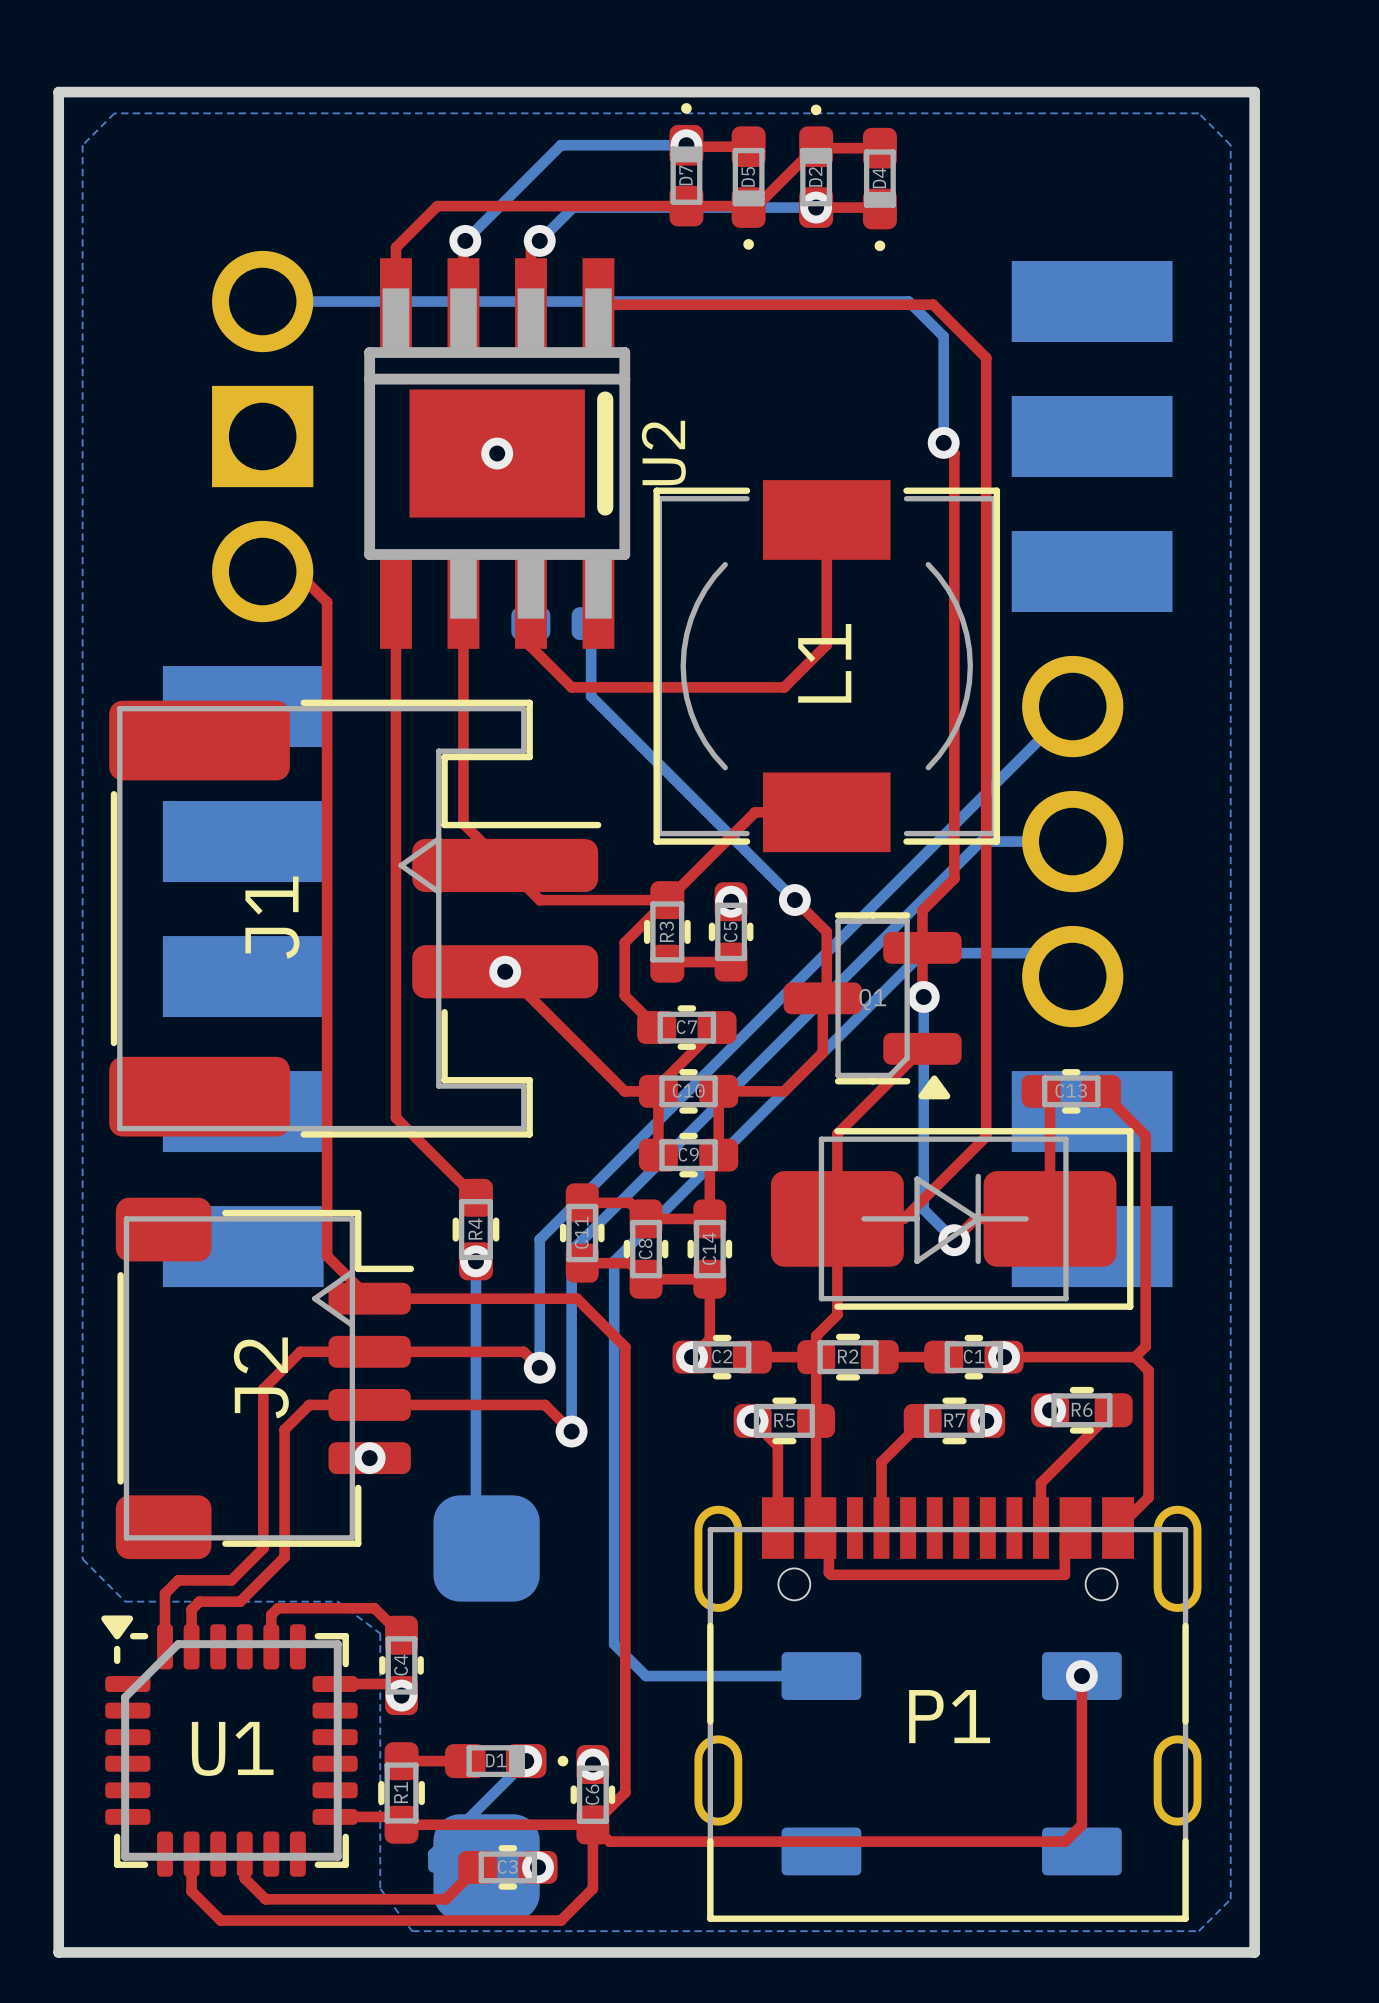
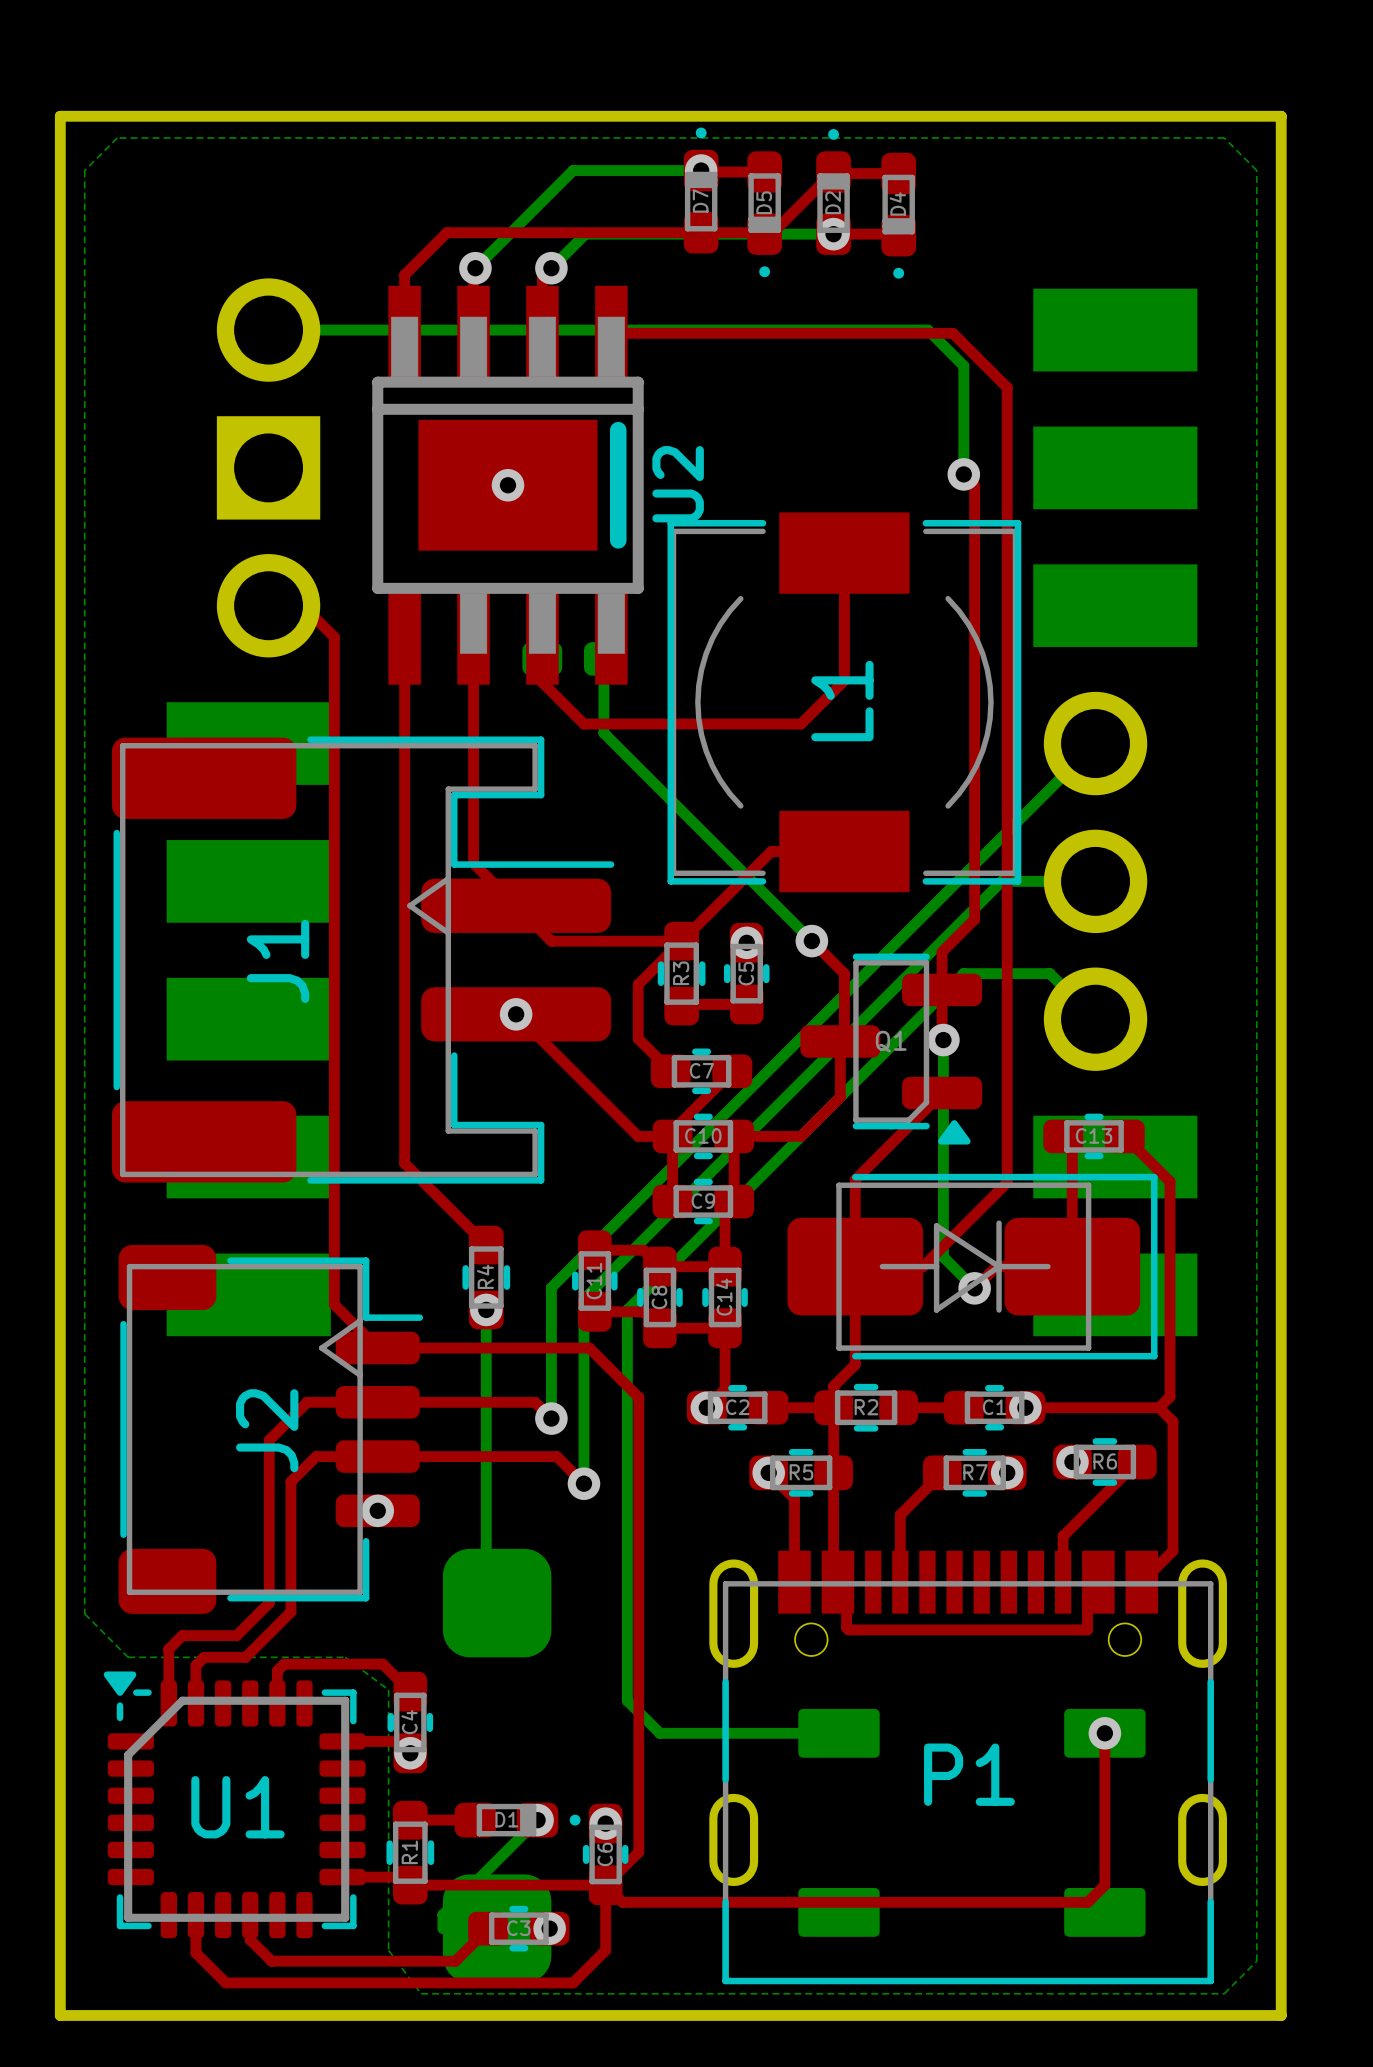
bottom track: (922, 953) (1049, 953) -> (942, 995) (963, 973) (1049, 973) (1071, 995)

